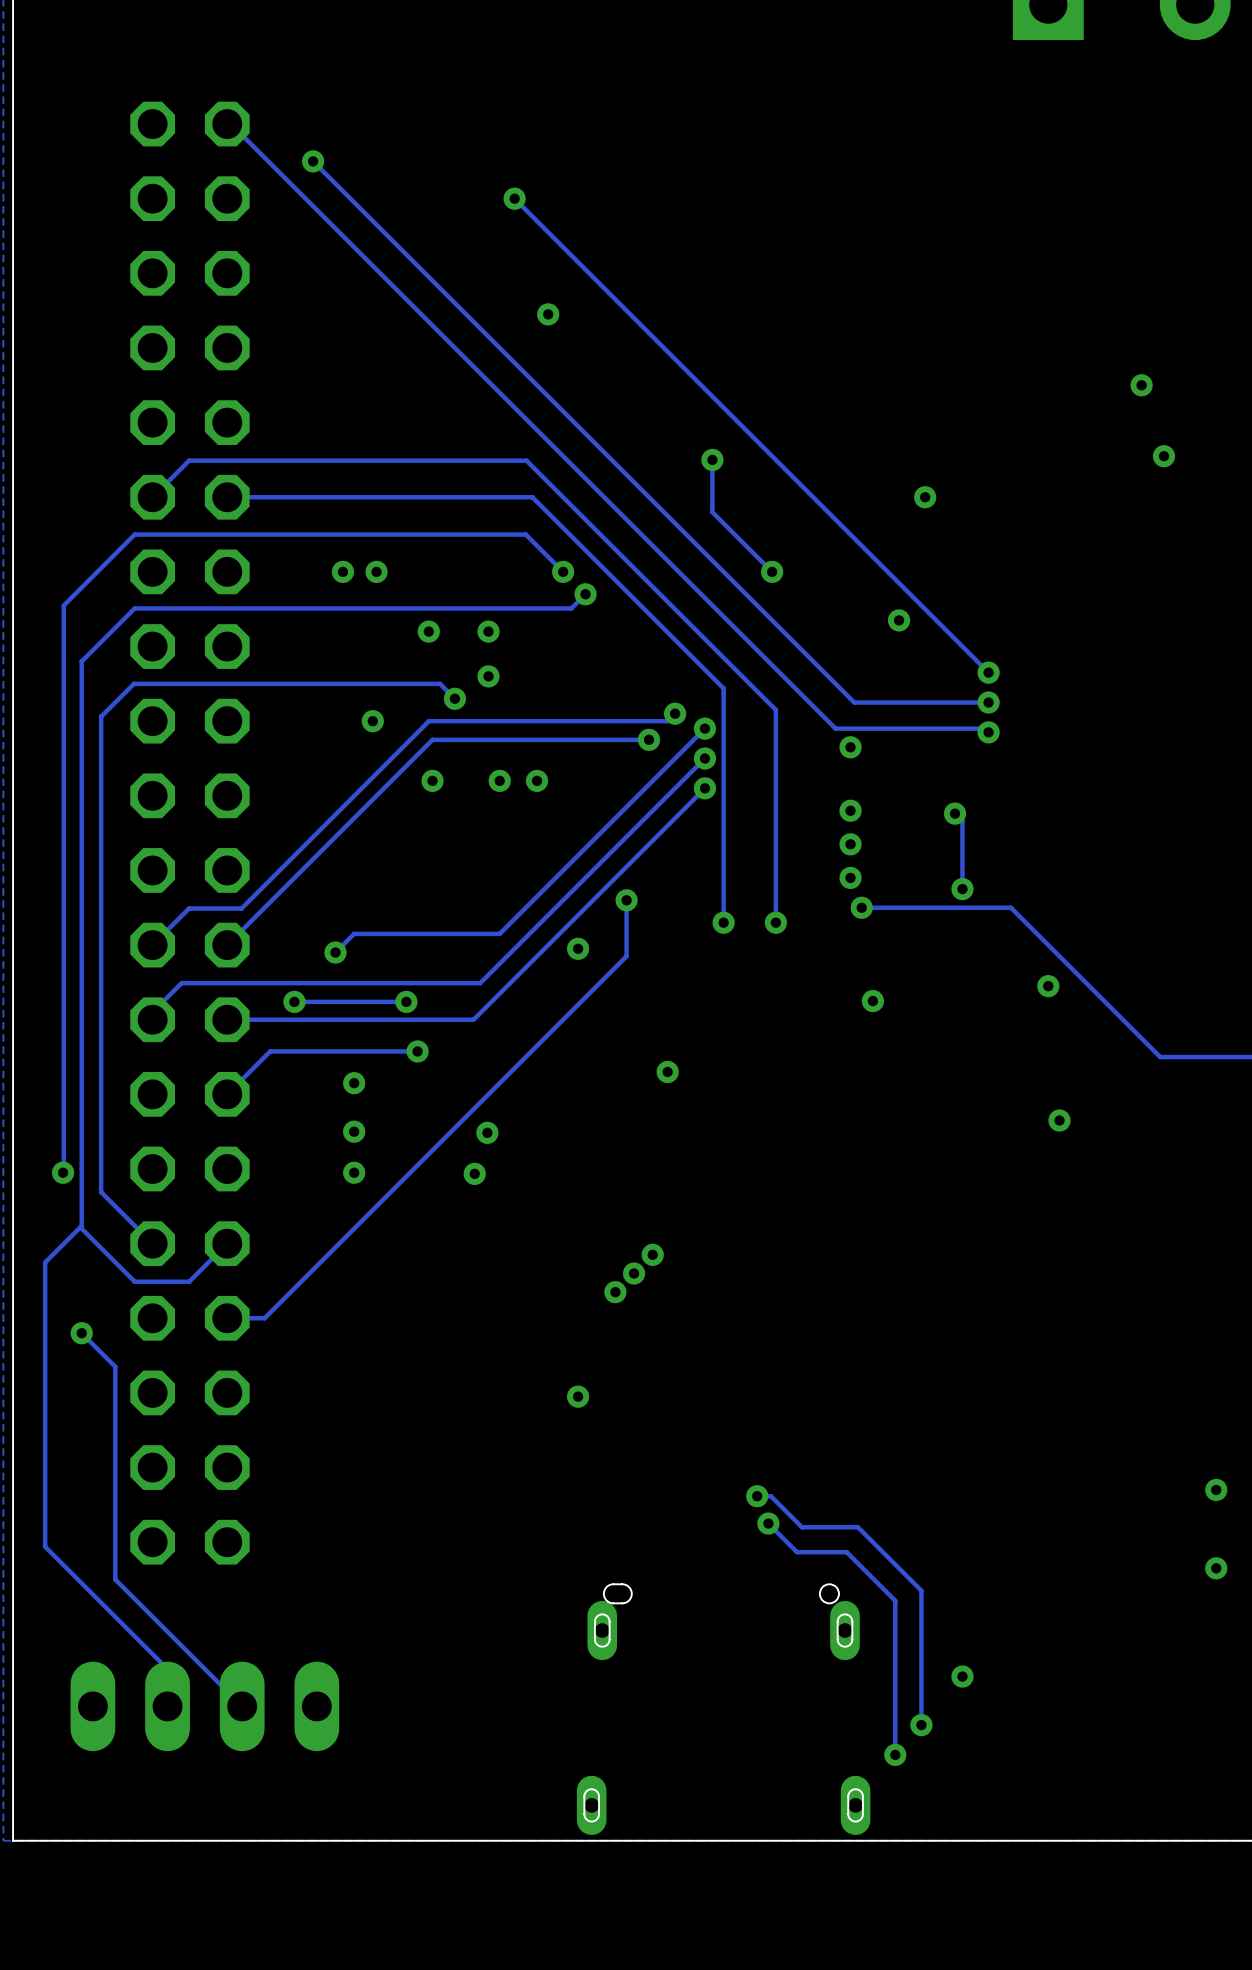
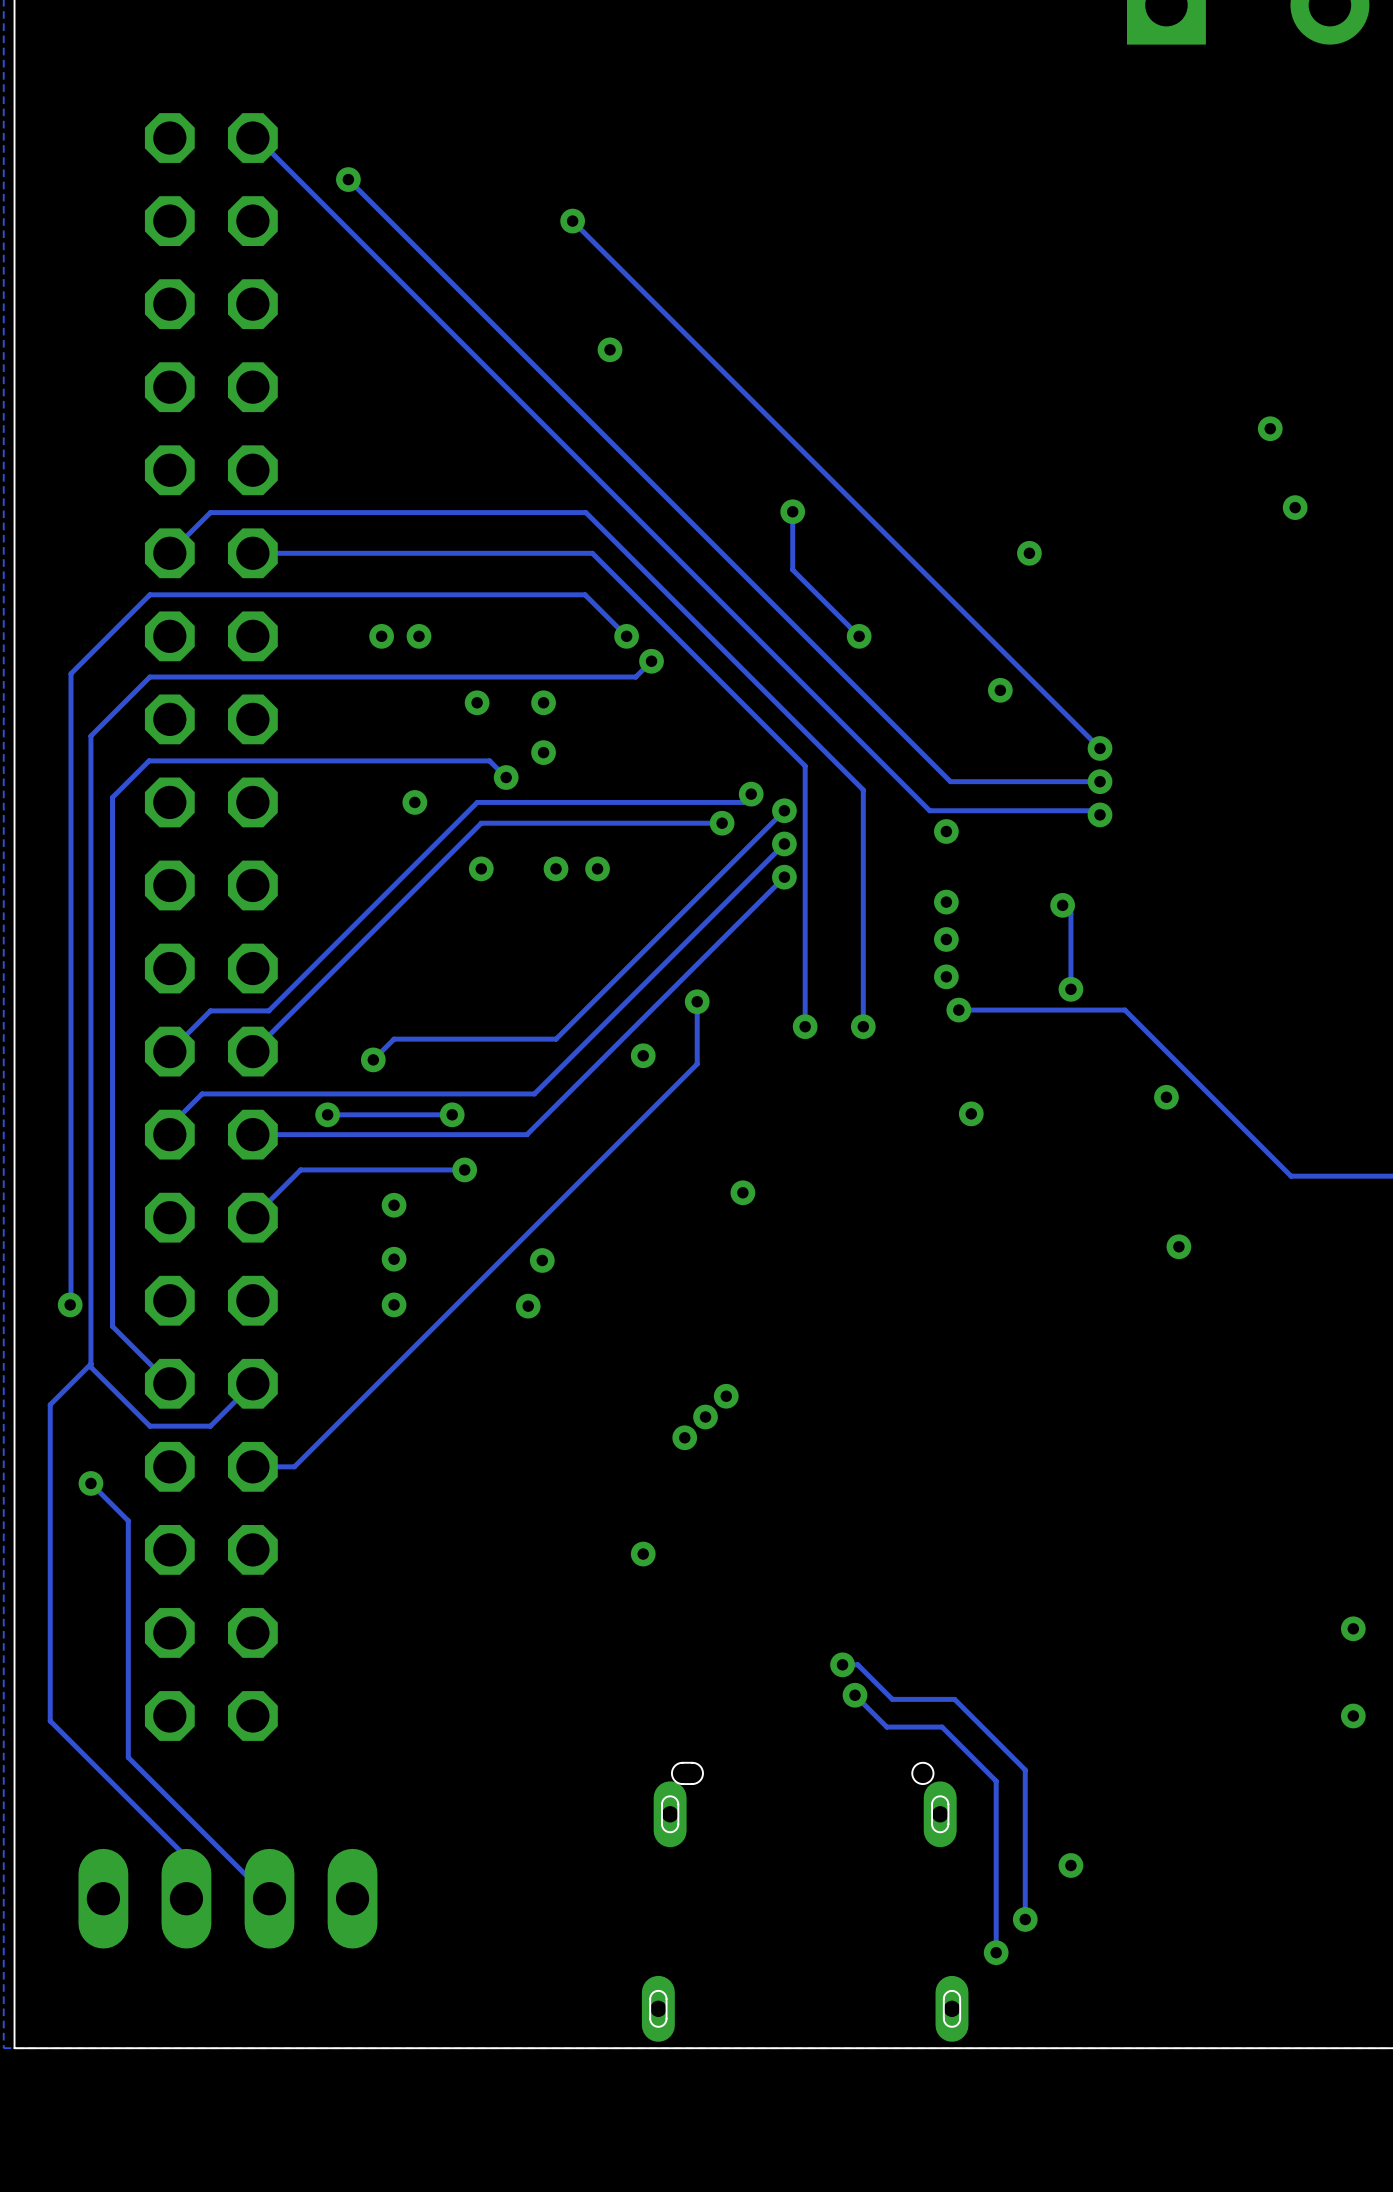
via: none -> (1353, 1628)
via: (1216, 1489) -> none
via: none -> (1353, 1716)
via: (1216, 1568) -> none

